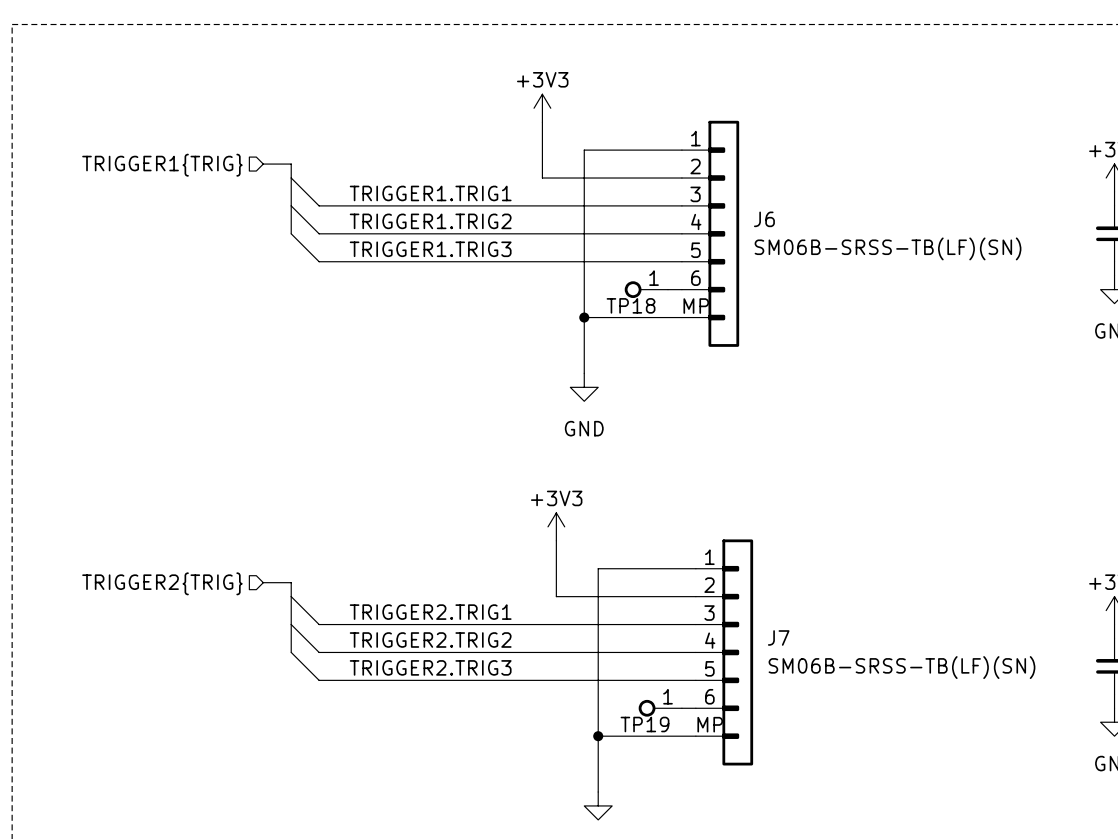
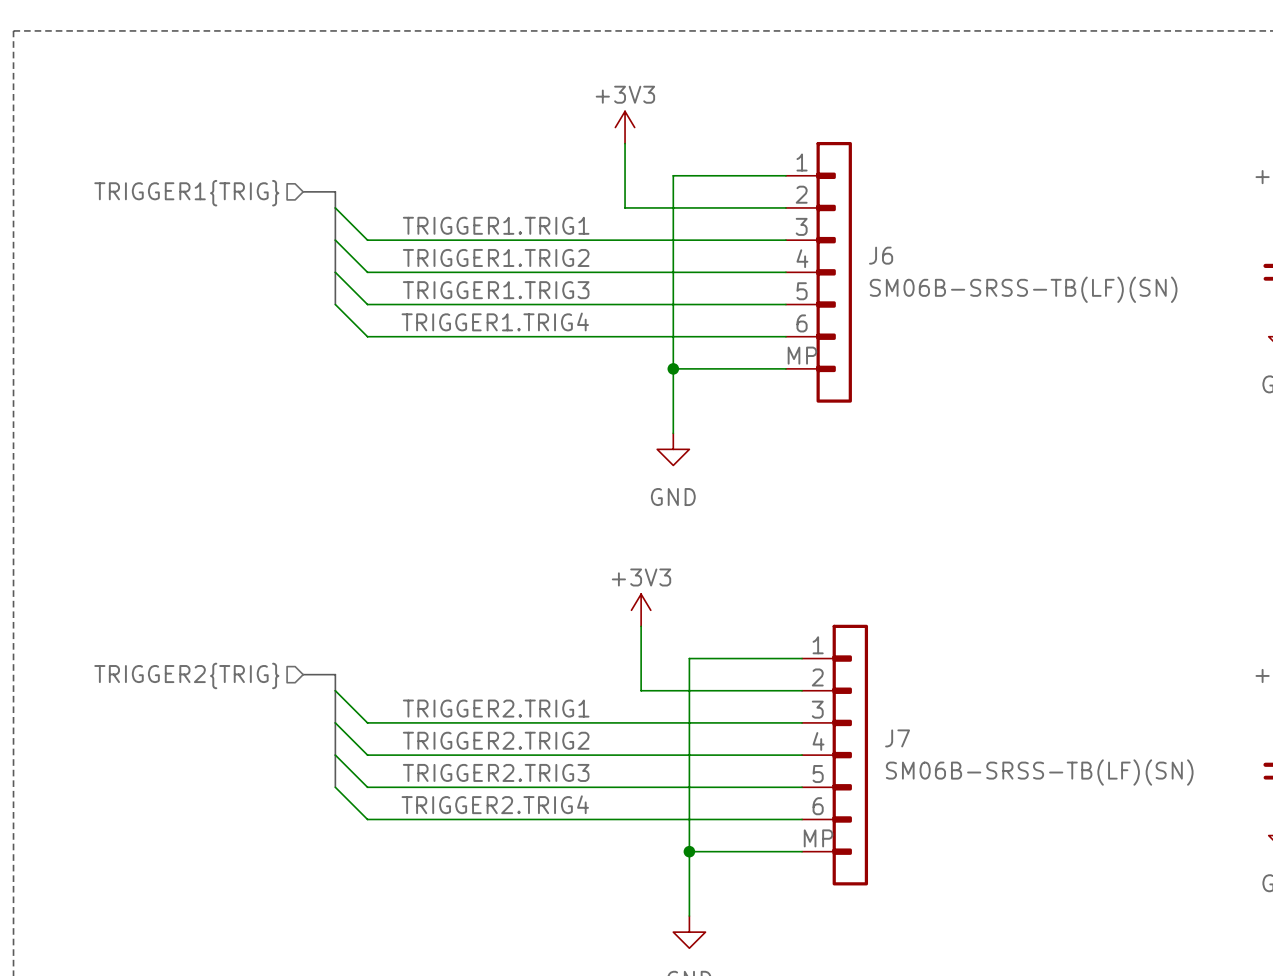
bus: none -> (335, 272) (335, 304)
wire: none -> (335, 304) (367, 336) (769, 336)
label: none -> TRIGGER1.TRIG4 (495, 321)
TP18: (646, 289) -> none
bus: none -> (335, 755) (335, 787)
wire: none -> (335, 787) (367, 819) (785, 819)
label: none -> TRIGGER2.TRIG4 (495, 804)
TP19: (660, 708) -> none

